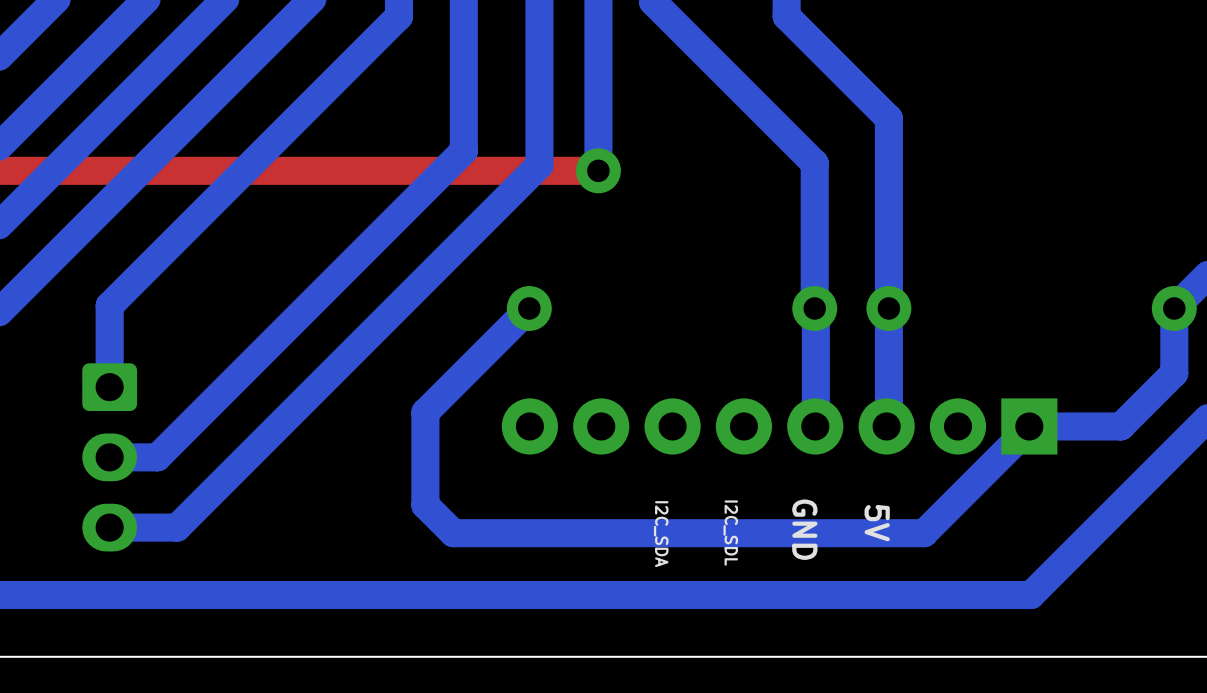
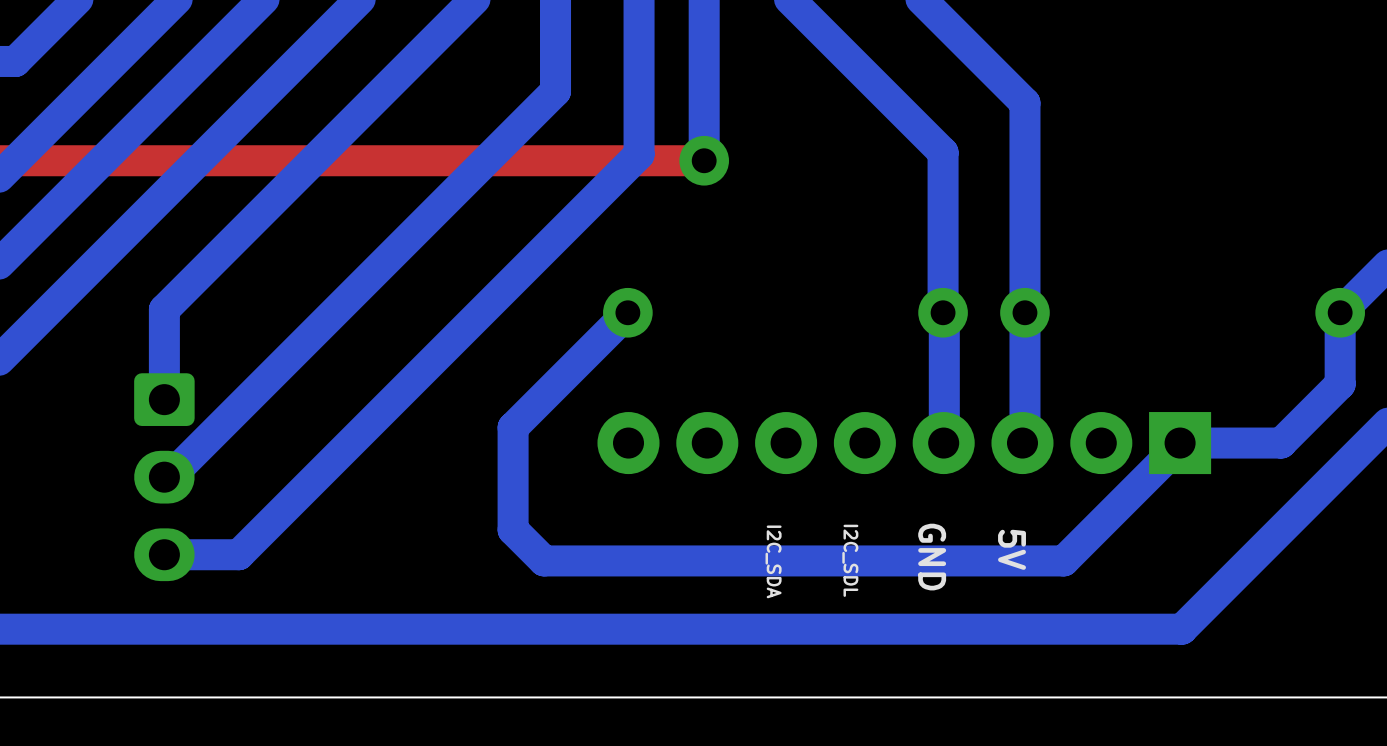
bottom track: (463, 107) (463, 150) (157, 457) (114, 457) -> (555, 91) (169, 477)

